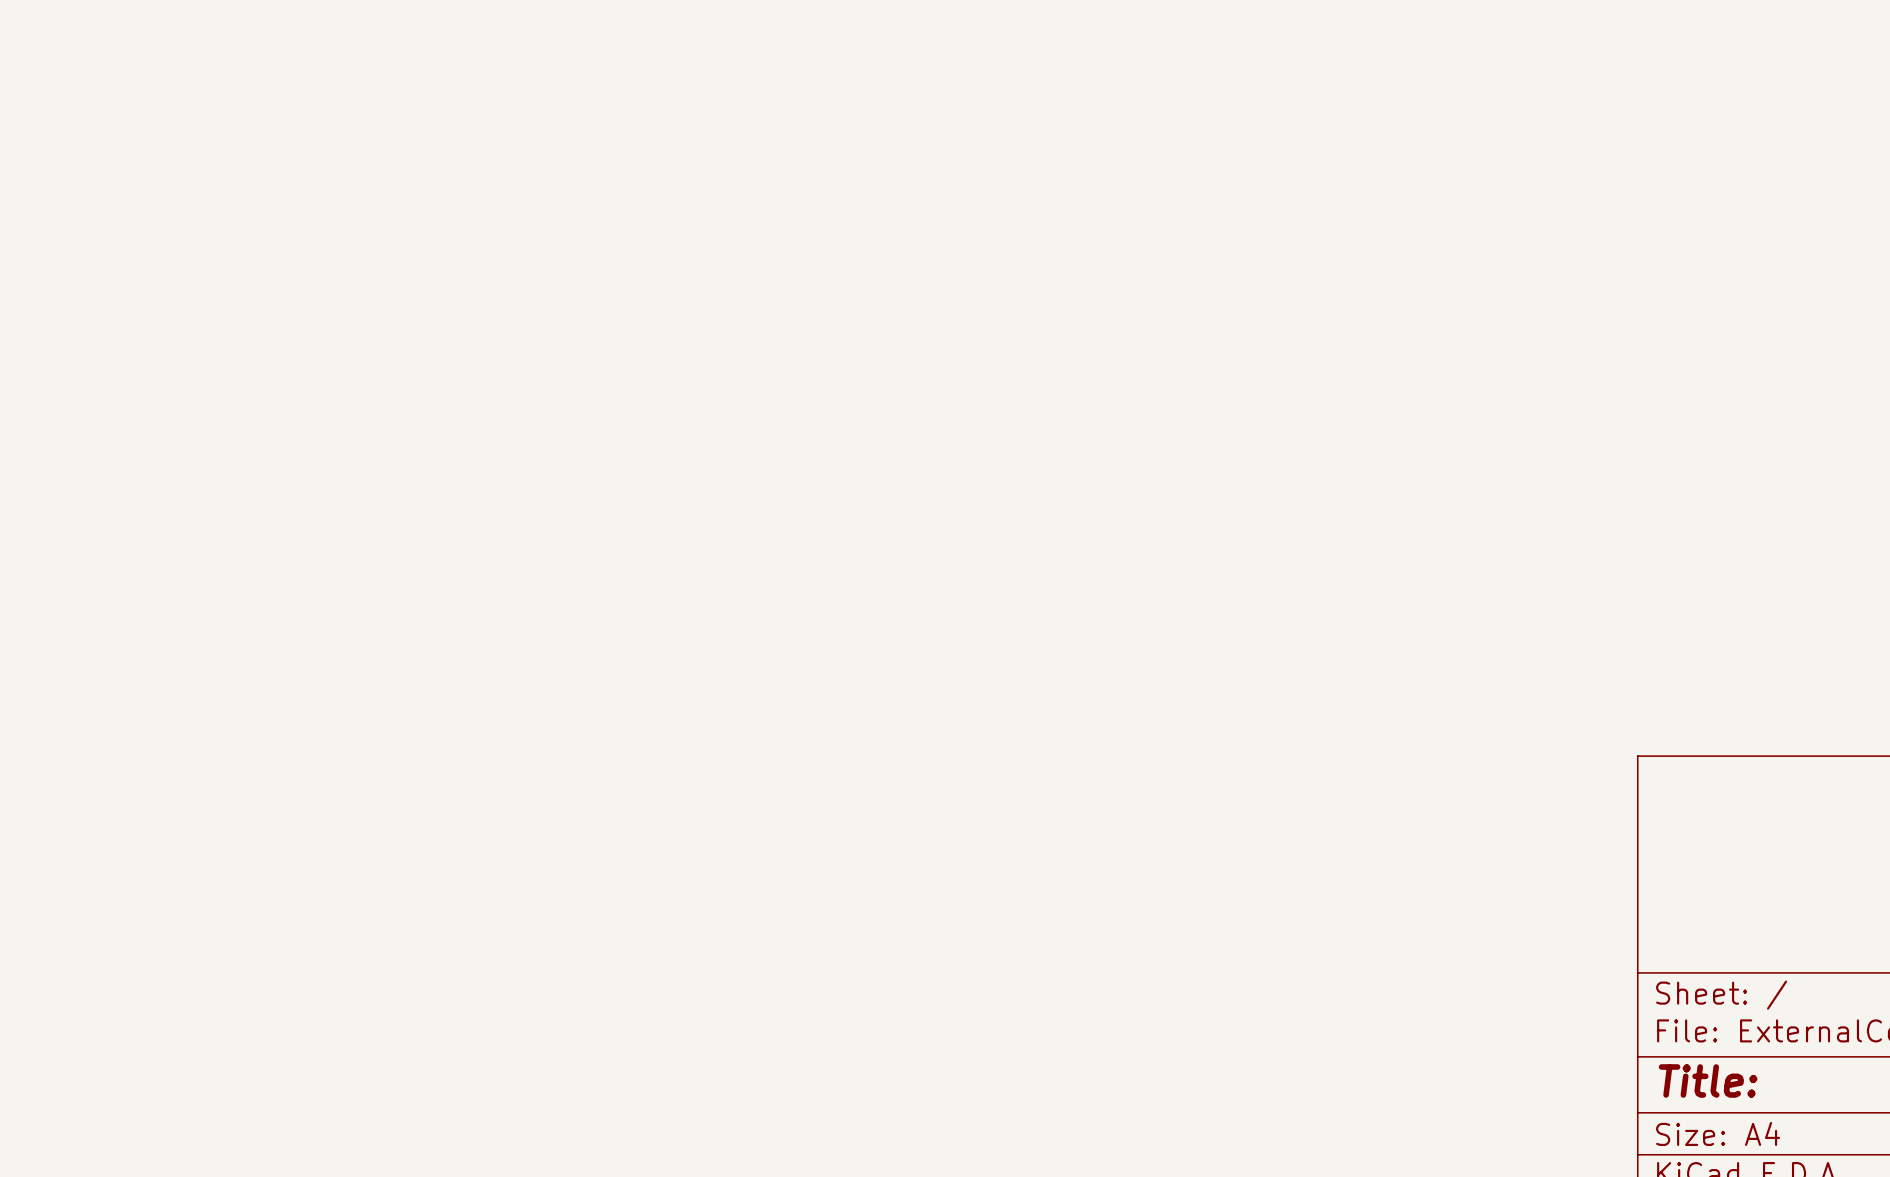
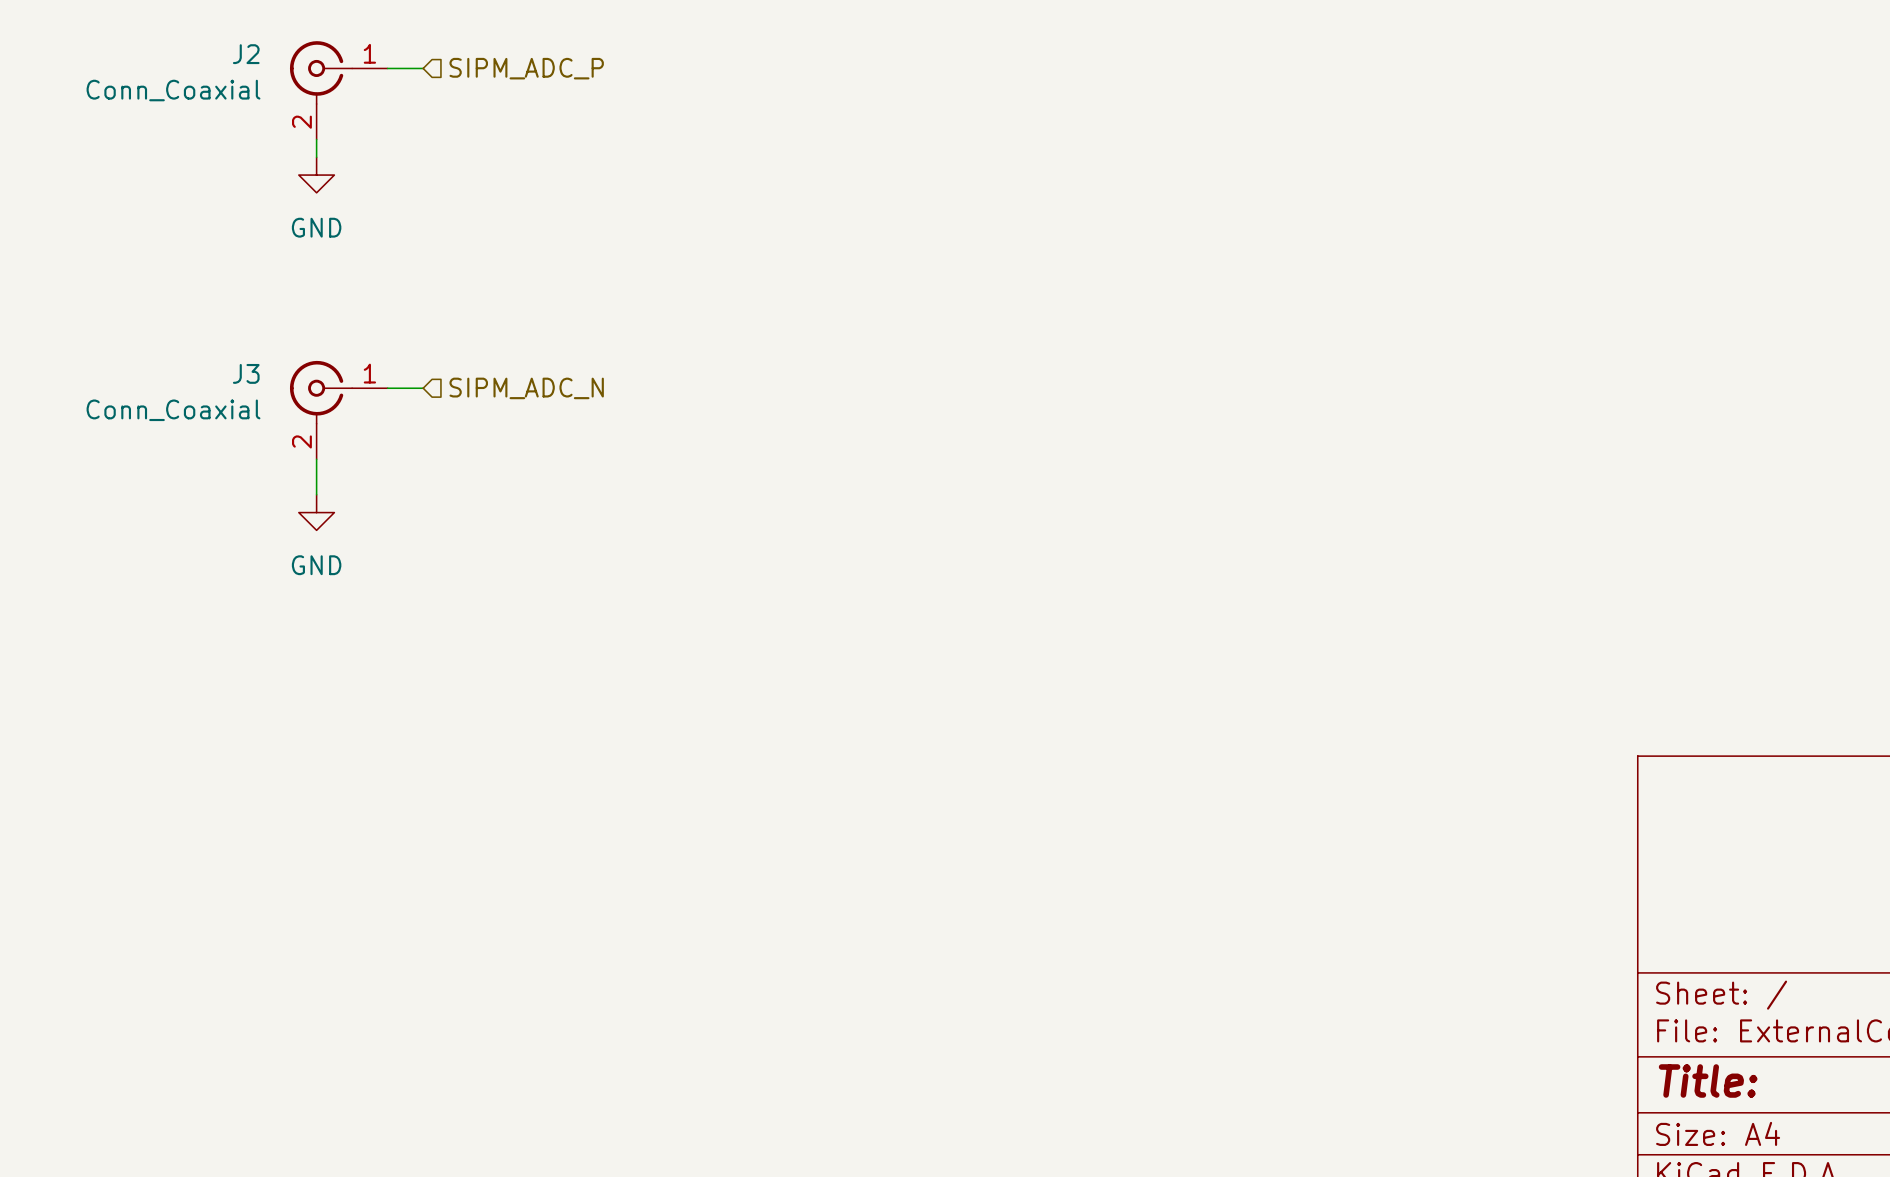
wire: none -> (387, 68) (423, 68)
hierarchical label: none -> SIPM_ADC_P (526, 68)
J2: none -> Conn_Coaxial (338, 90)
wire: none -> (316, 139) (316, 157)
power symbol: none -> GND (316, 175)
wire: none -> (387, 388) (423, 388)
hierarchical label: none -> SIPM_ADC_N (526, 388)
J3: none -> Conn_Coaxial (338, 410)
wire: none -> (316, 459) (316, 494)
power symbol: none -> GND (316, 512)

